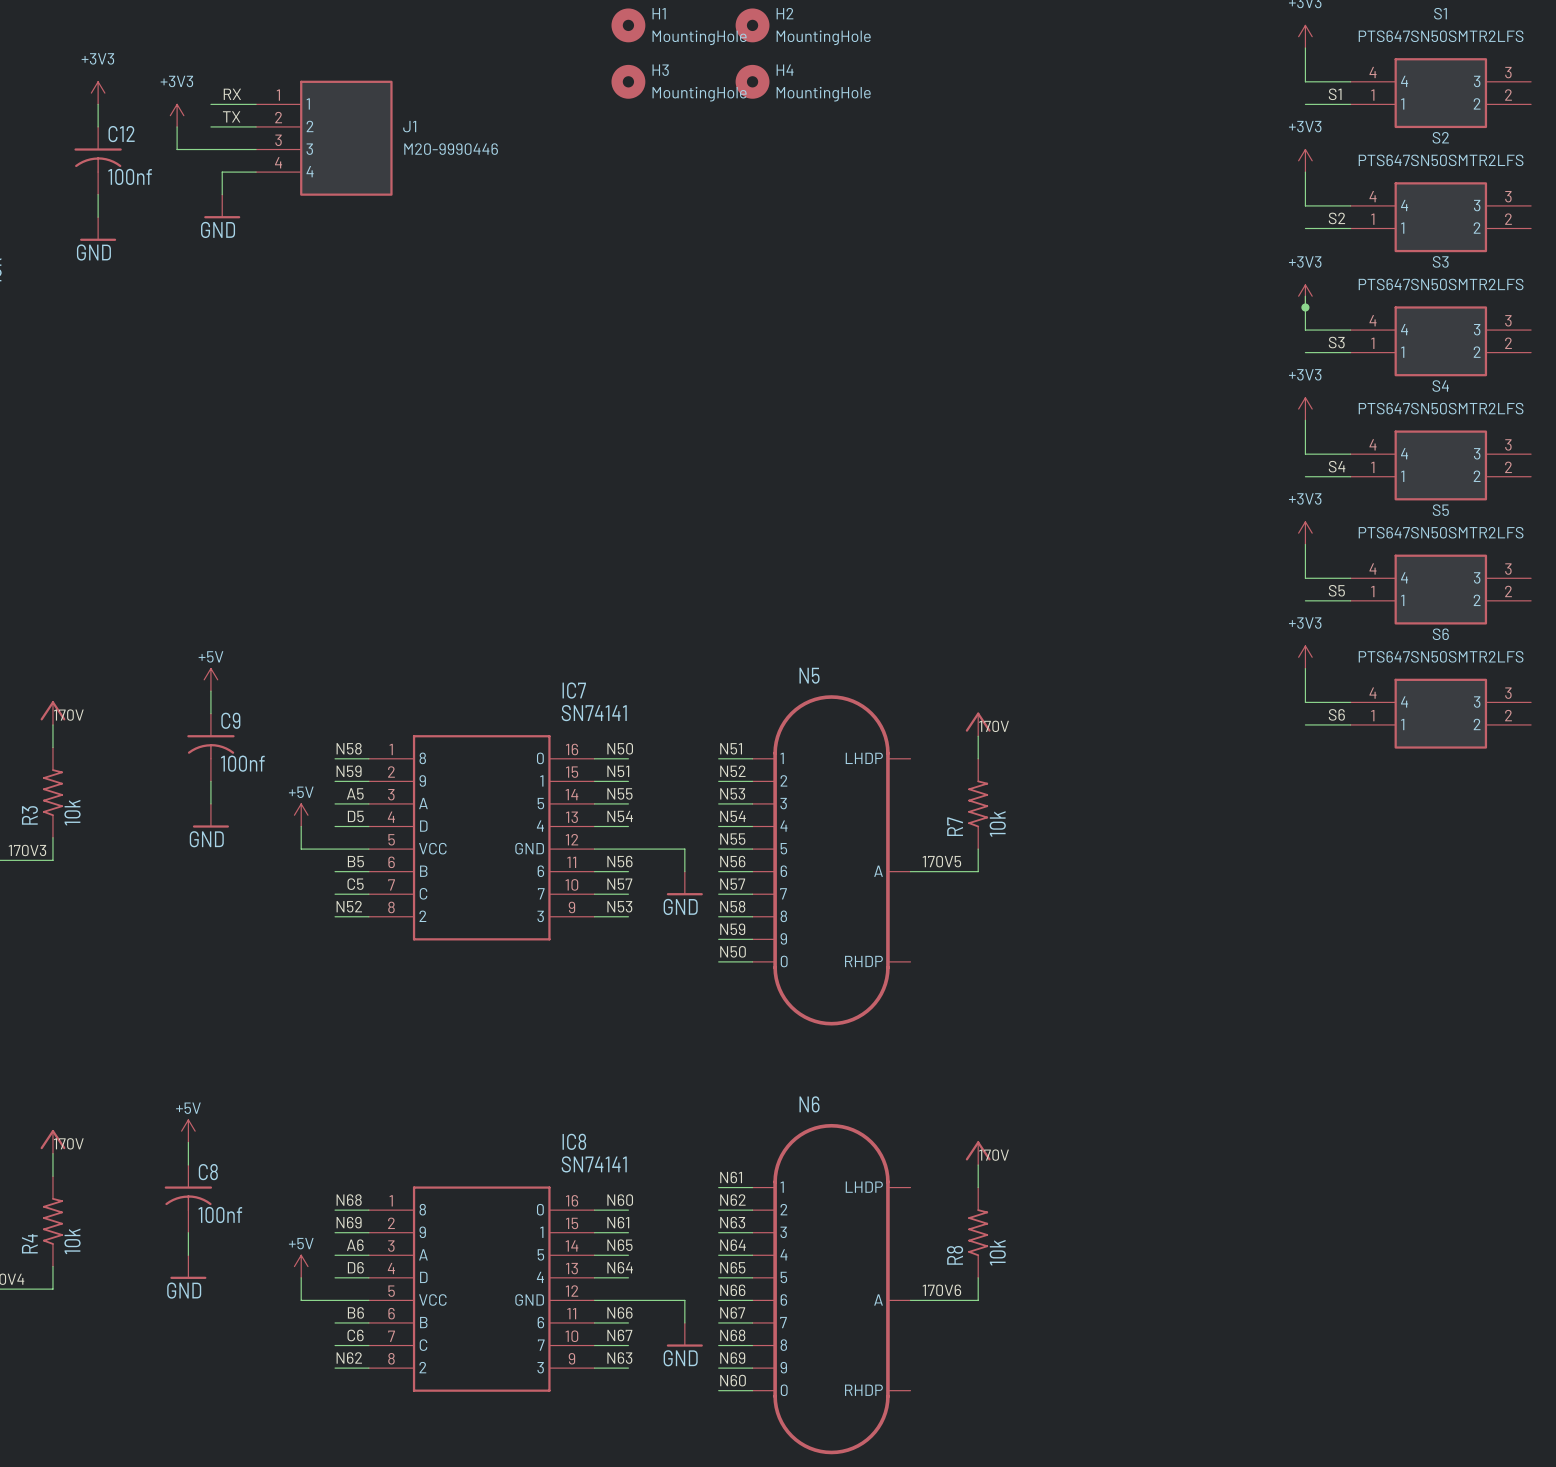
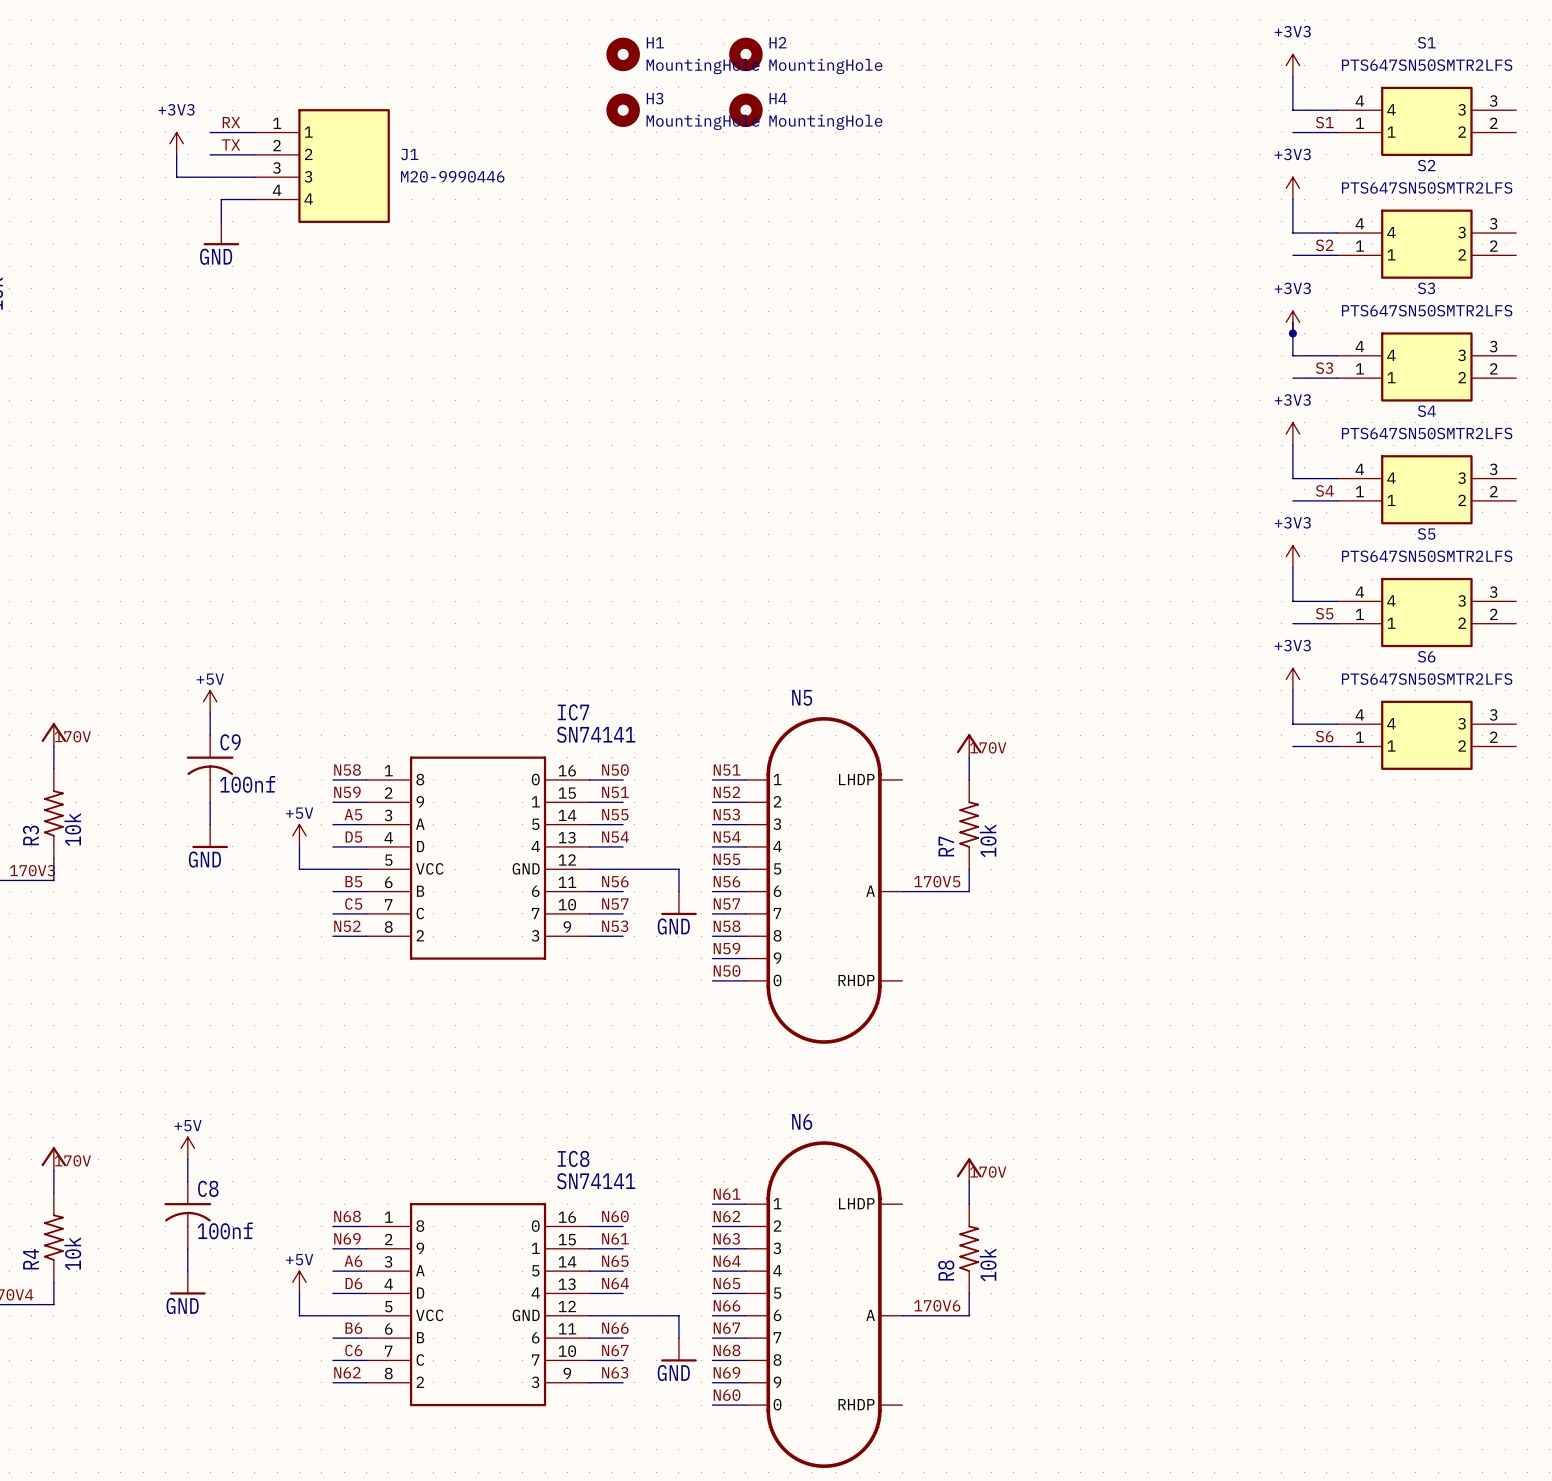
power symbol: +3V3 (98, 93) -> none
wire: (98, 104) (98, 126) -> none
C12: 100nf (98, 160) -> none
wire: (98, 194) (98, 217) -> none
power symbol: GND (98, 229) -> none

